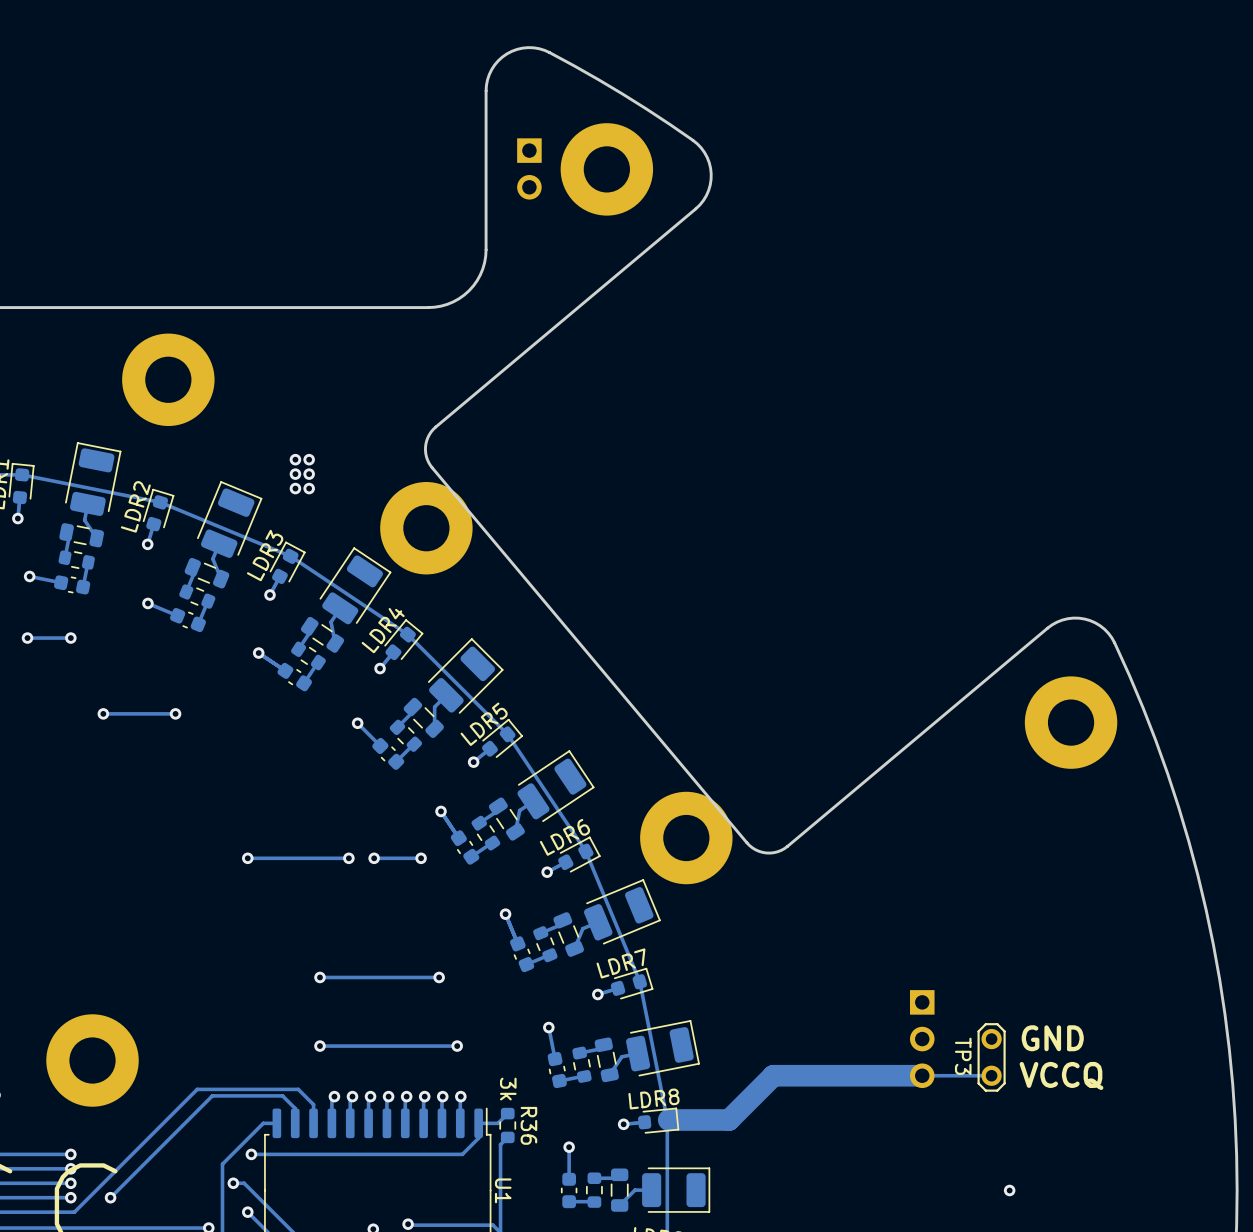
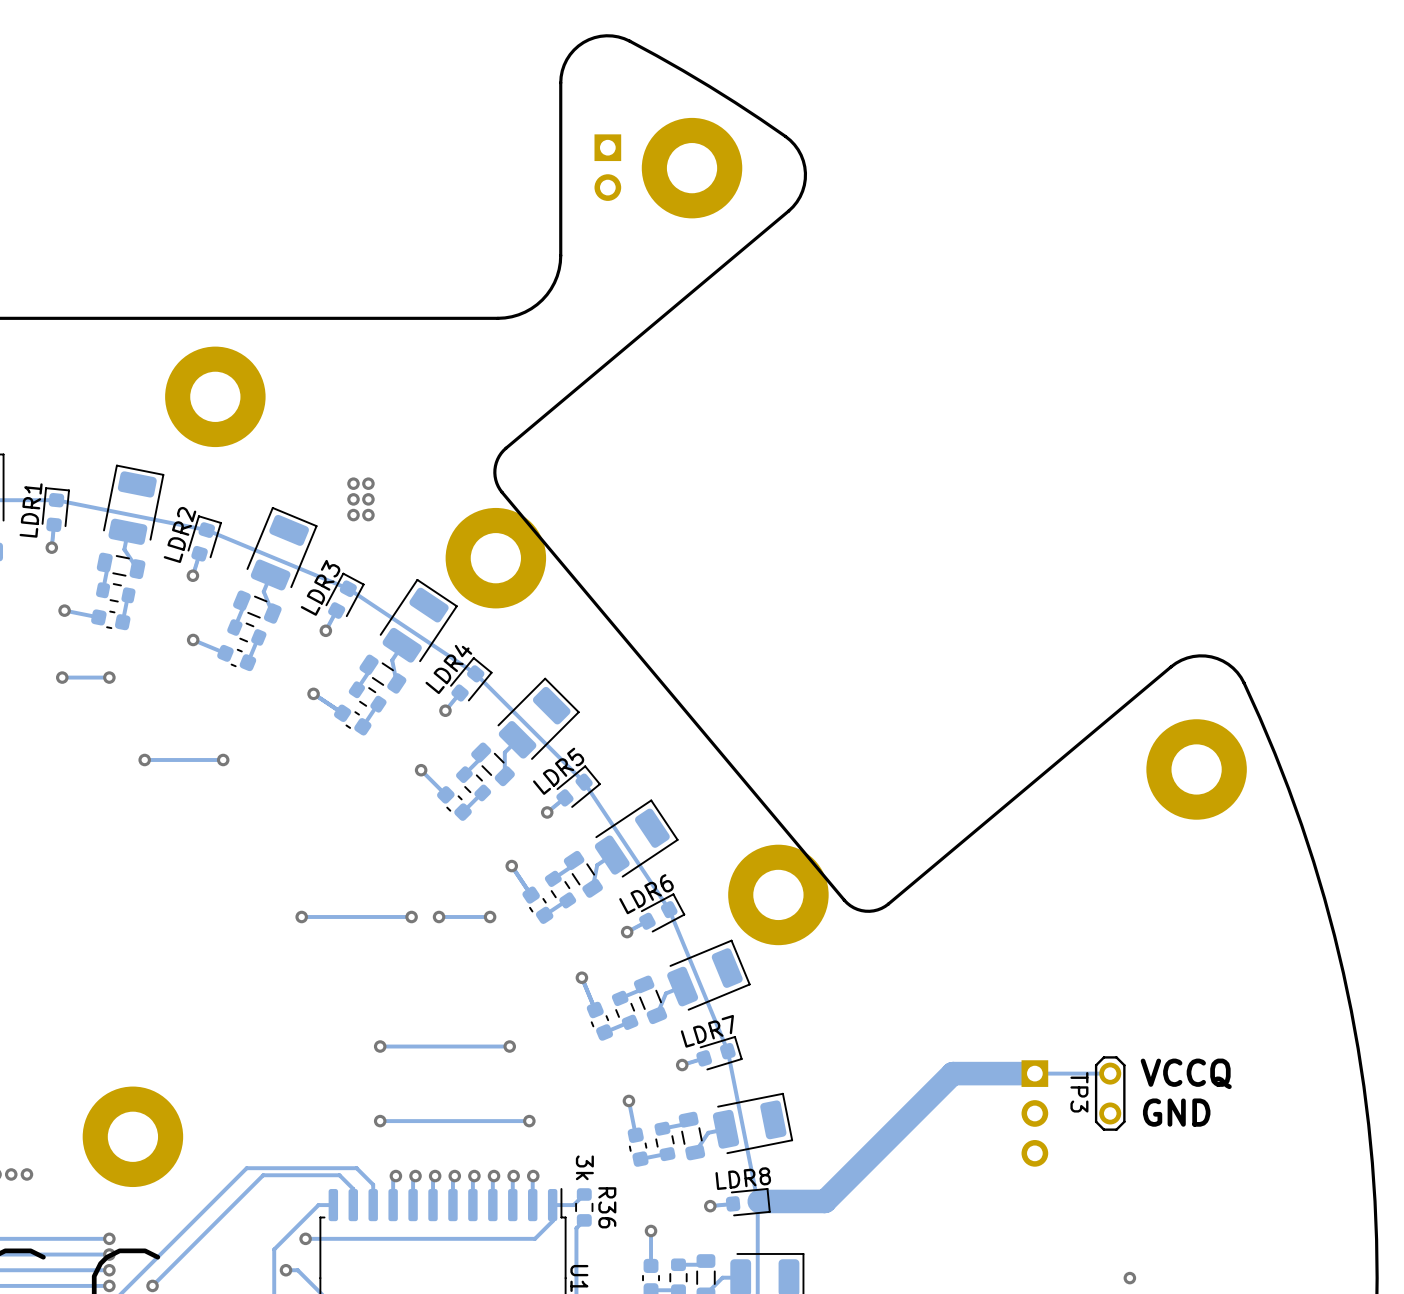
TP3 position: (991, 1057) -> (1110, 1093)
track: (991, 1075) (773, 1075) -> (1110, 1073) (952, 1073) (873, 1153)
text position: VCCQ (1061, 1075) -> VCCQ (1186, 1073)

